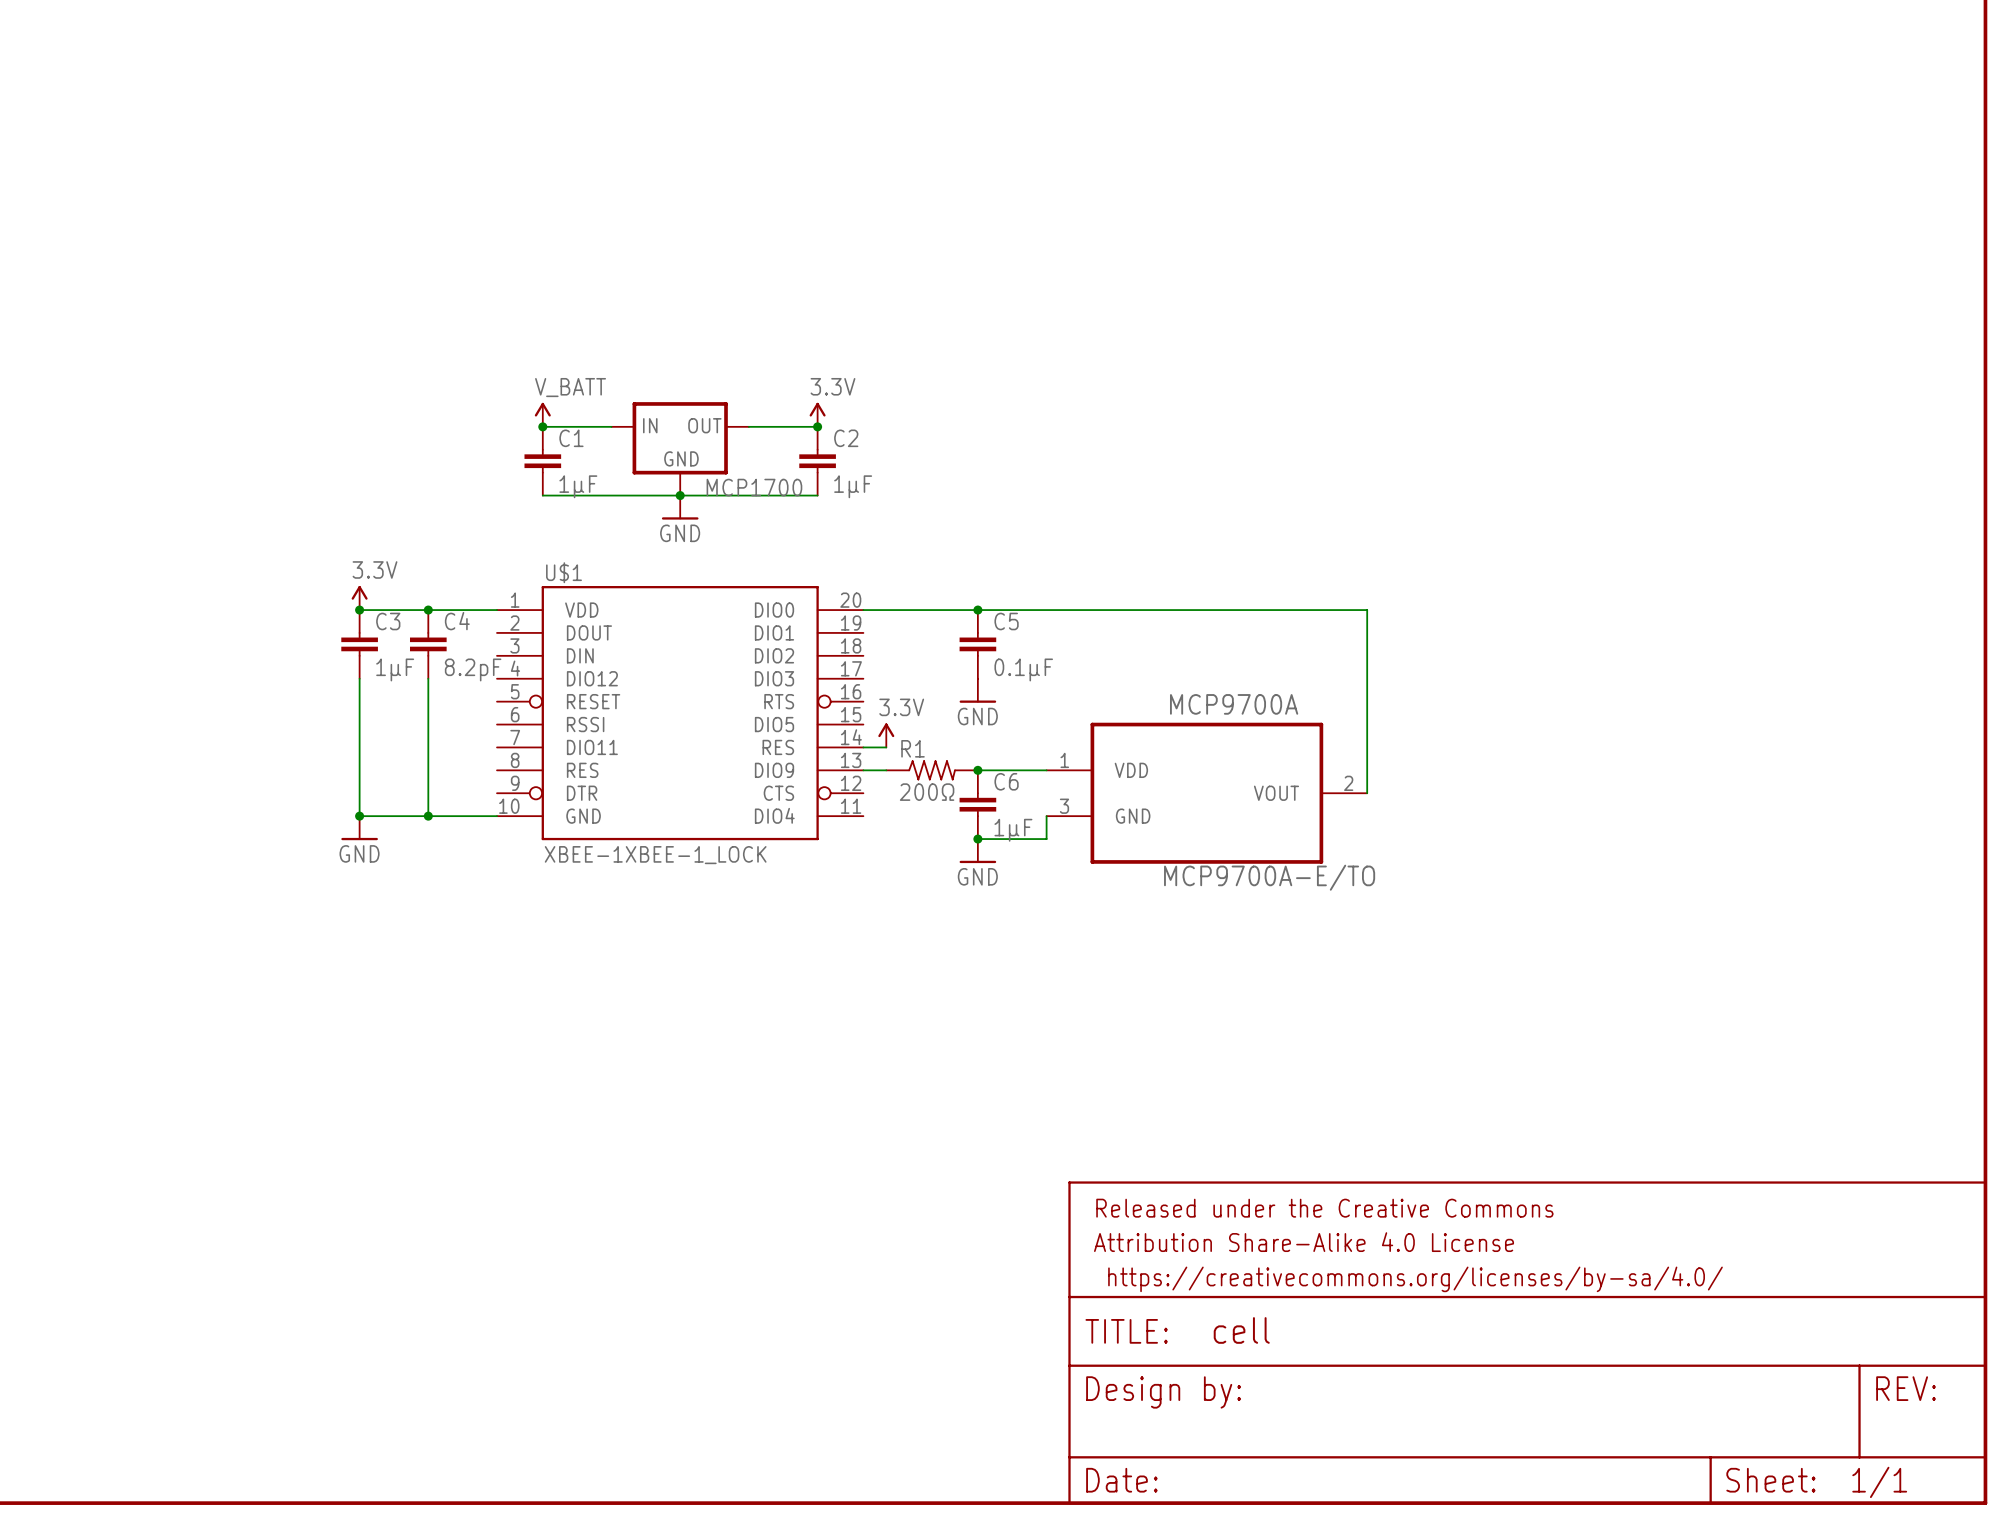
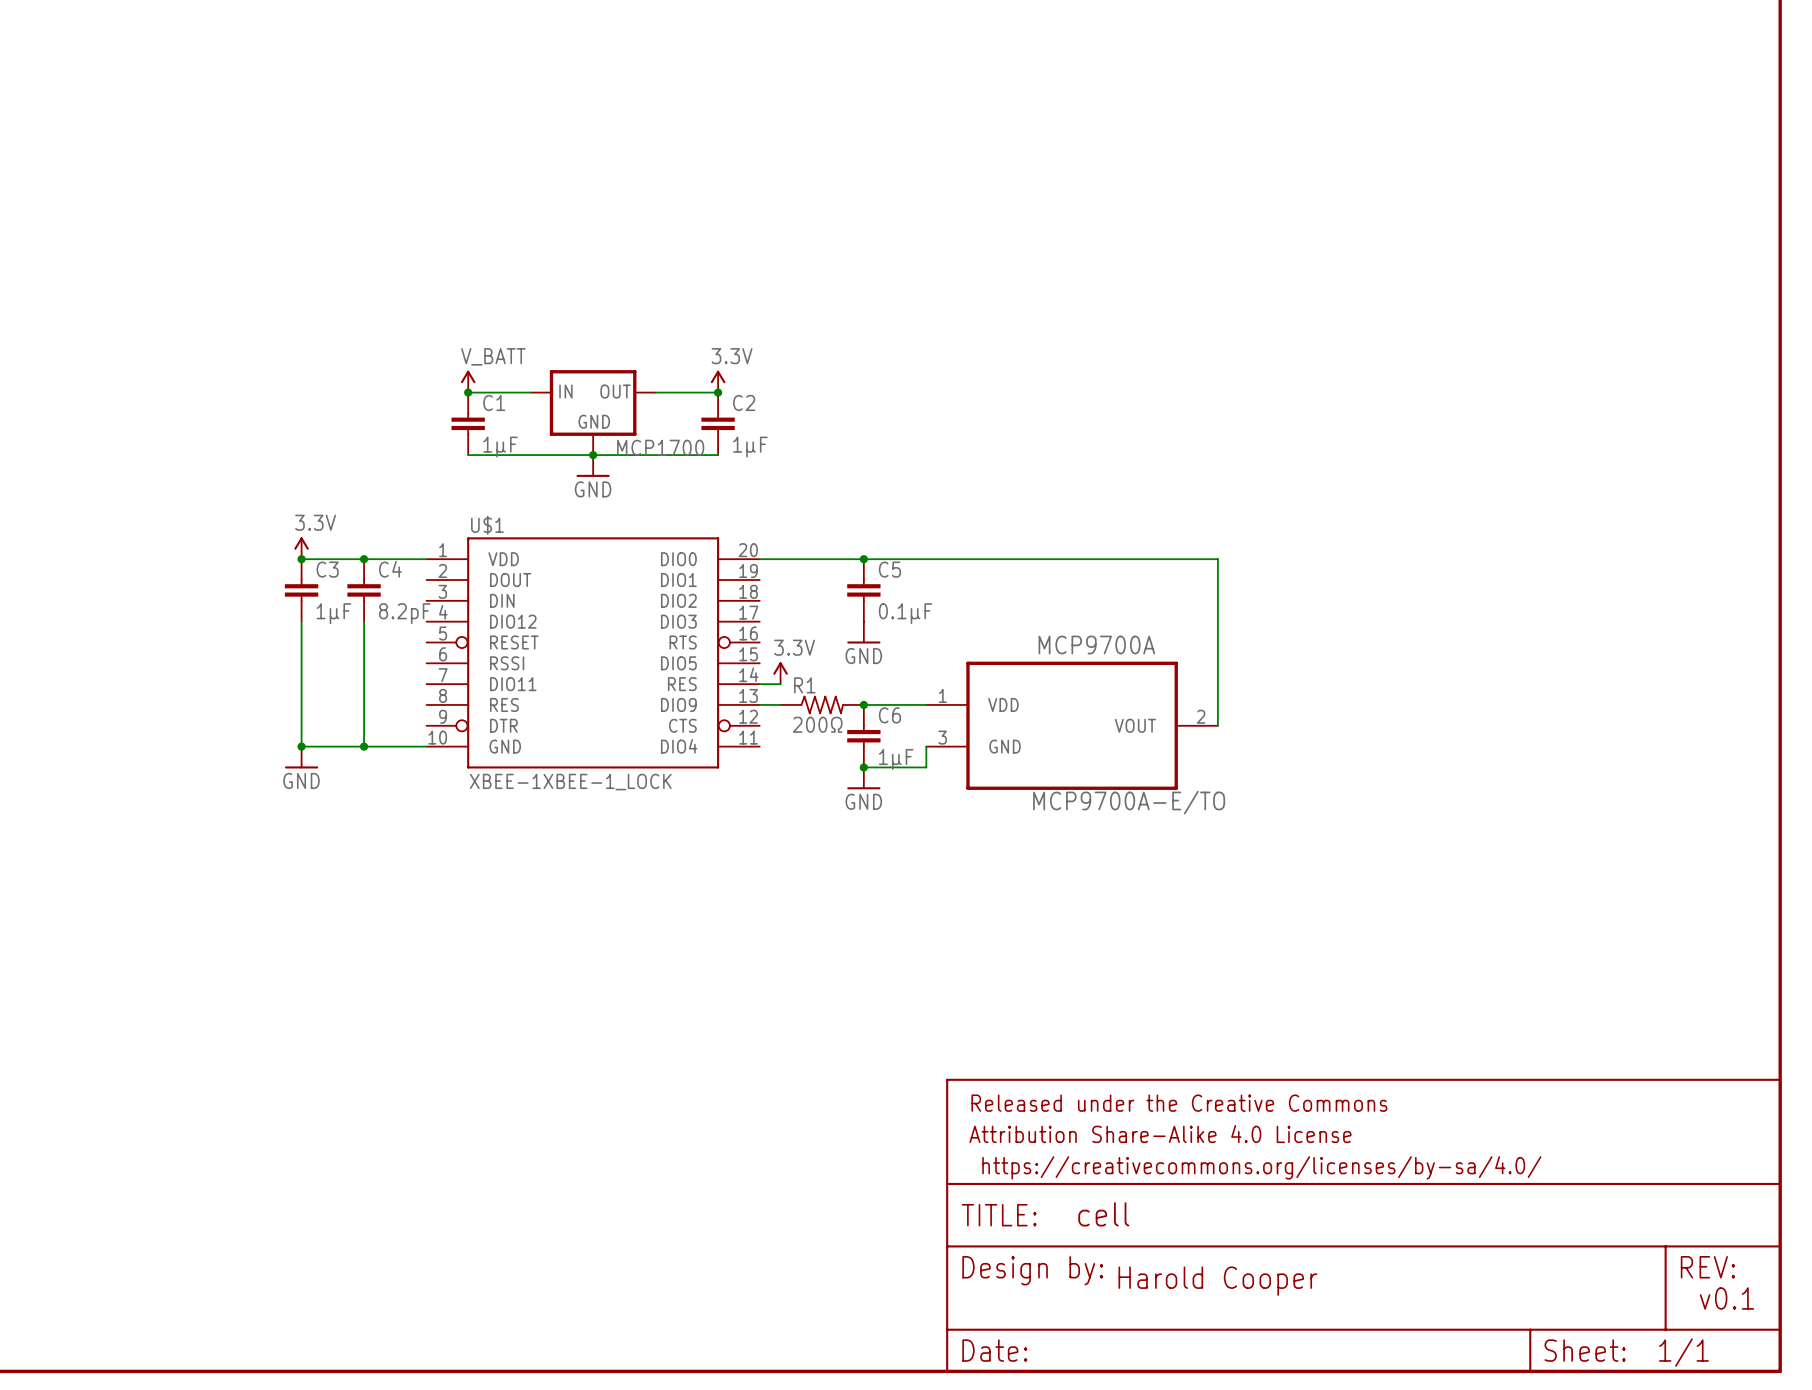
text: none -> Harold Cooper (1217, 1281)
text: none -> v0.1 (1726, 1298)

